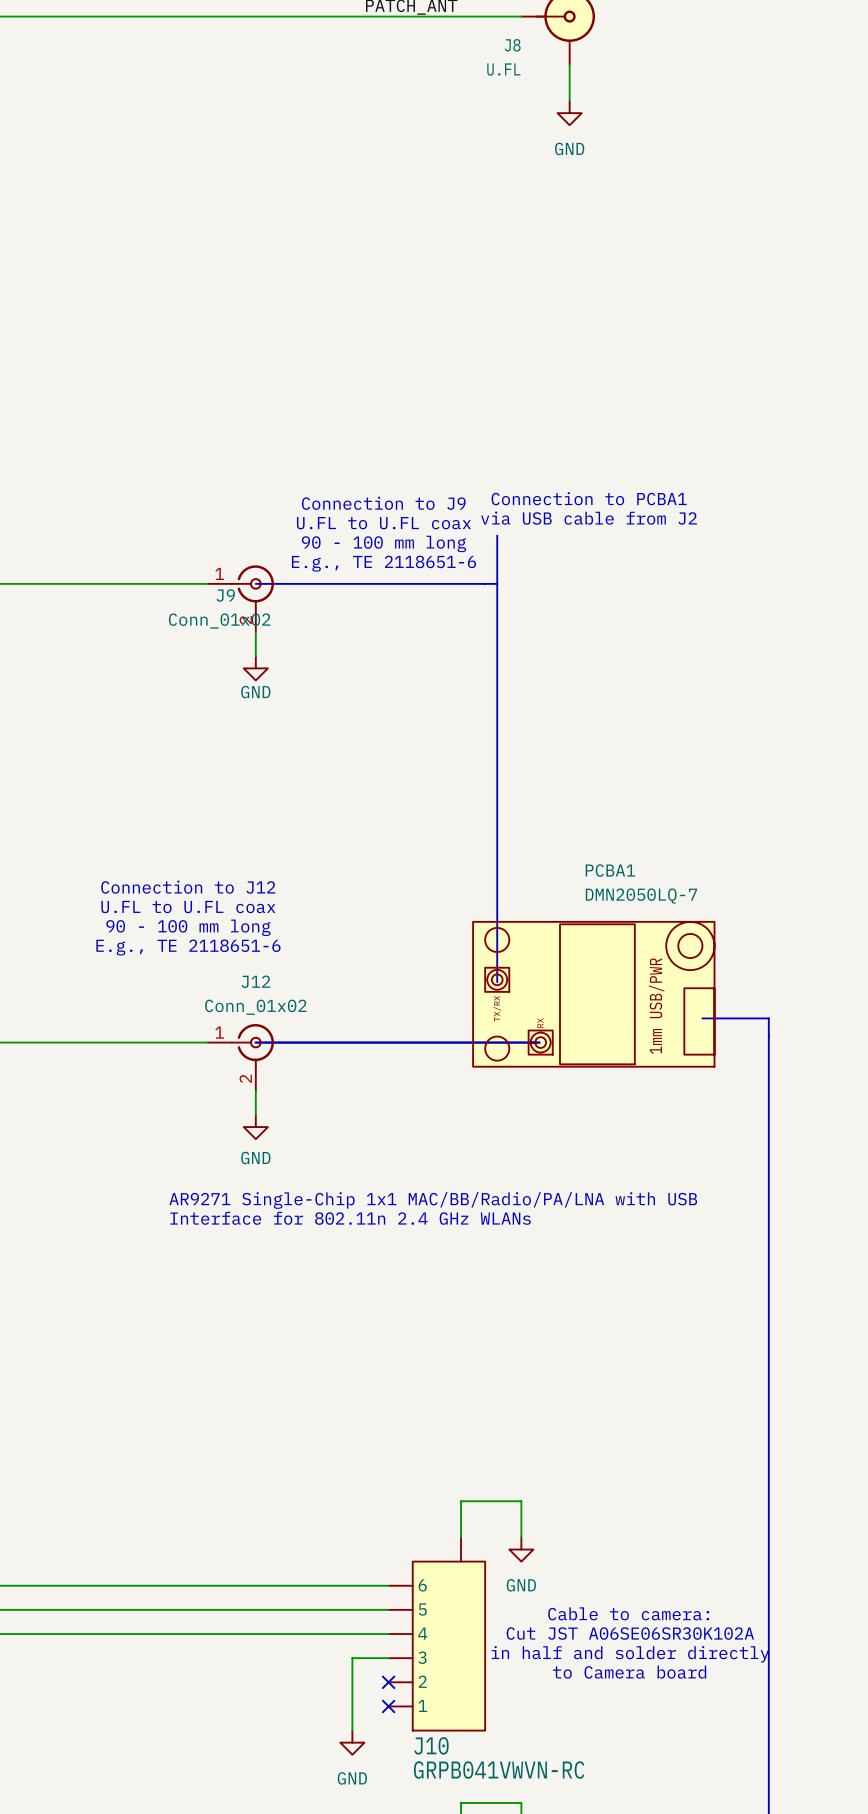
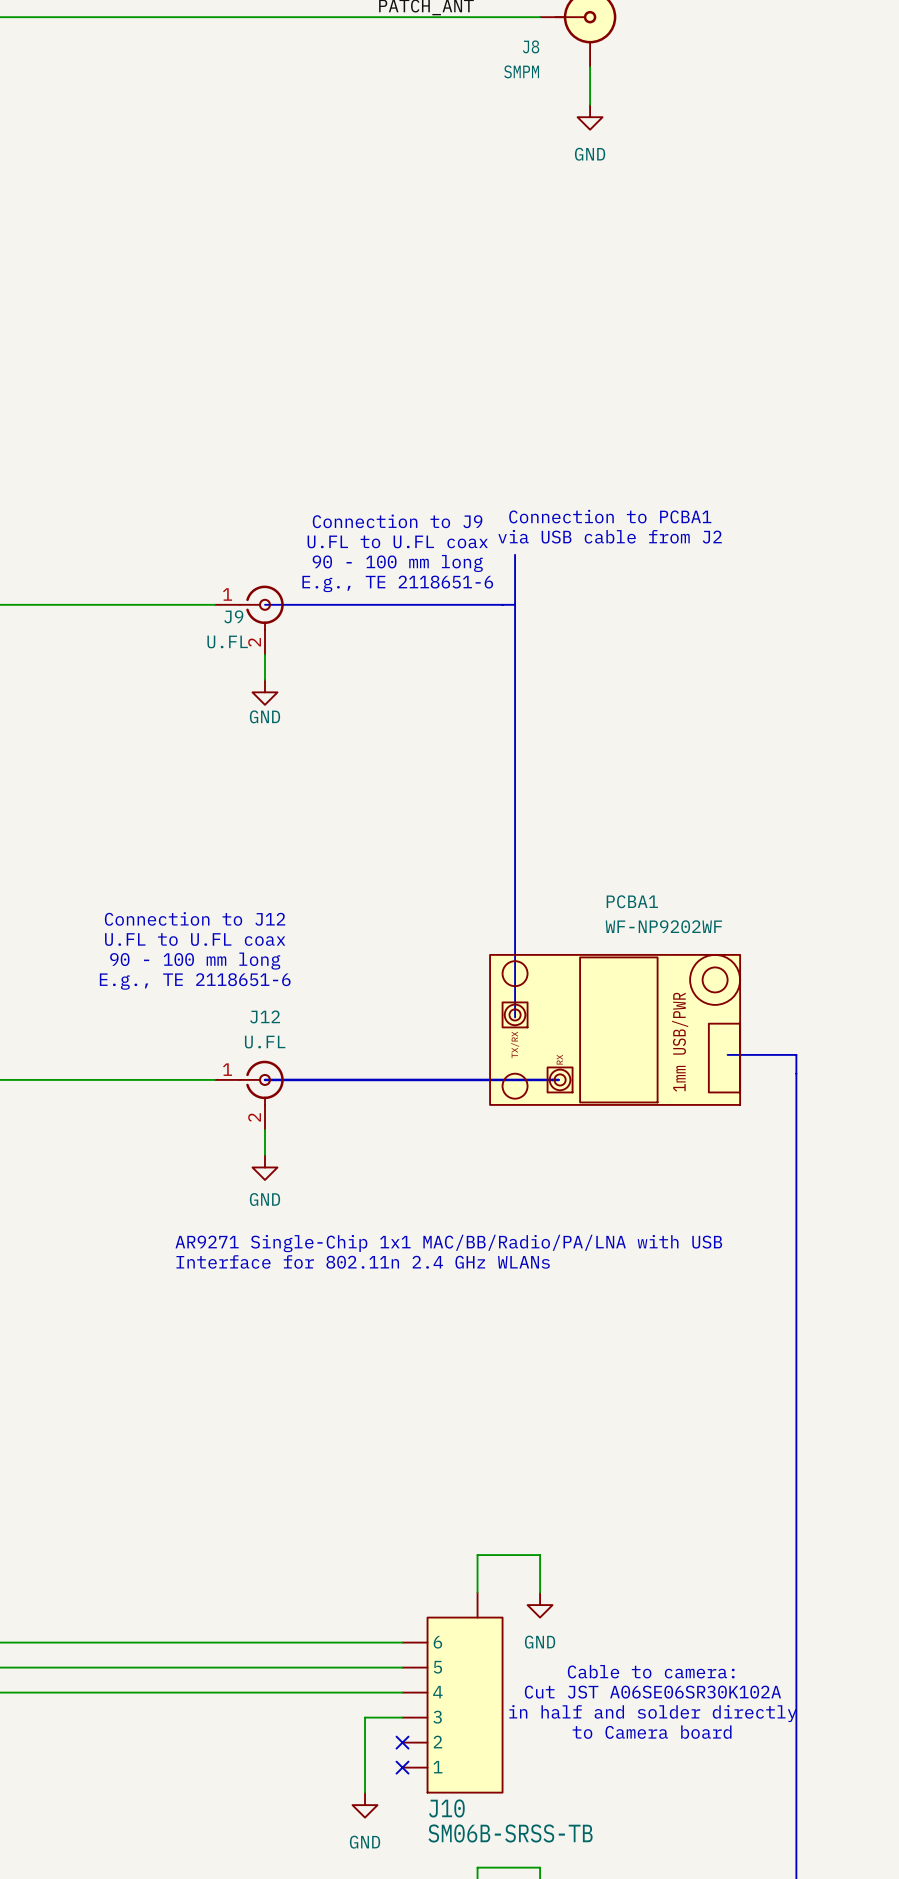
J8 value: U.FL (503, 69) -> SMPM (521, 71)
J9 value: Conn_01x02 (219, 621) -> U.FL (227, 641)
PCBA1 value: DMN2050LQ-7 (641, 895) -> WF-NP9202WF (663, 926)
J12 value: Conn_01x02 (255, 1007) -> U.FL (265, 1042)
J10 value: GRPB041VWVN-RC (499, 1770) -> SM06B-SRSS-TB (510, 1833)

